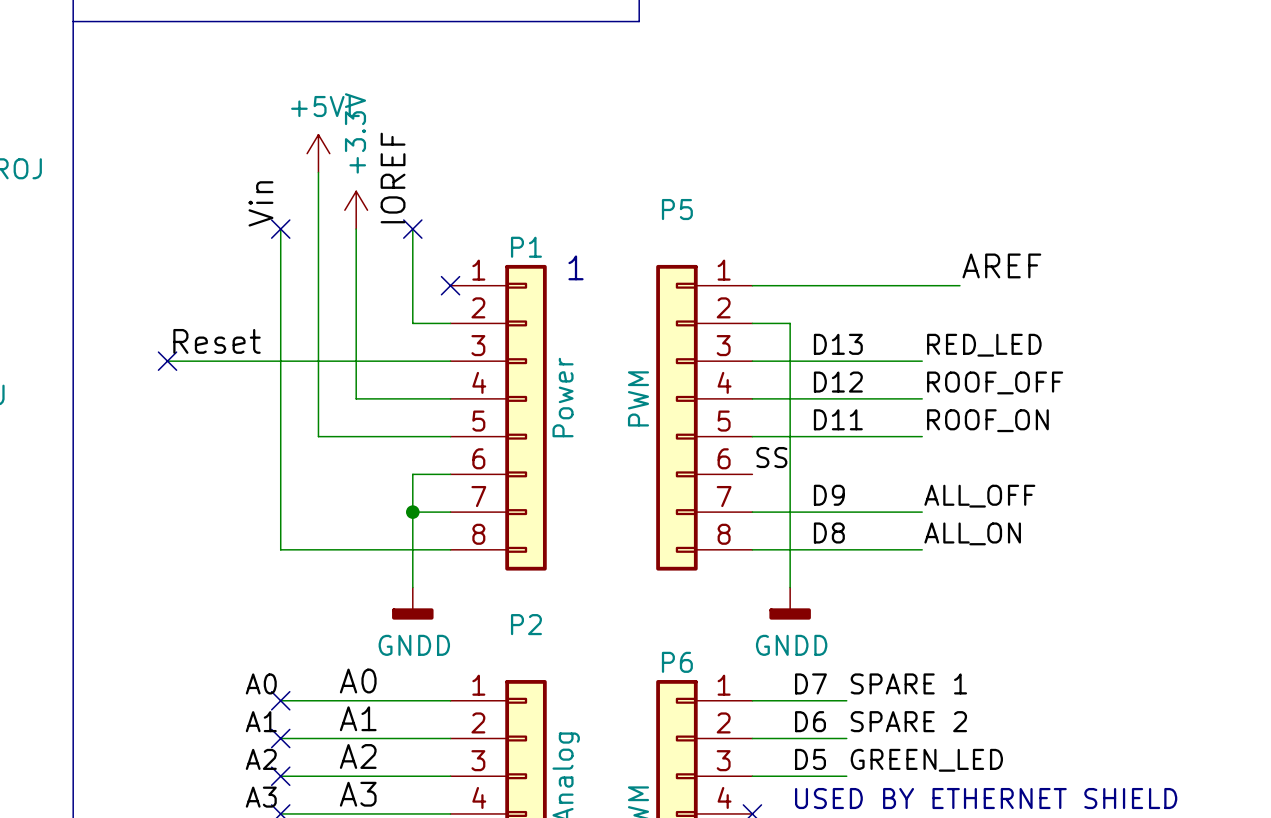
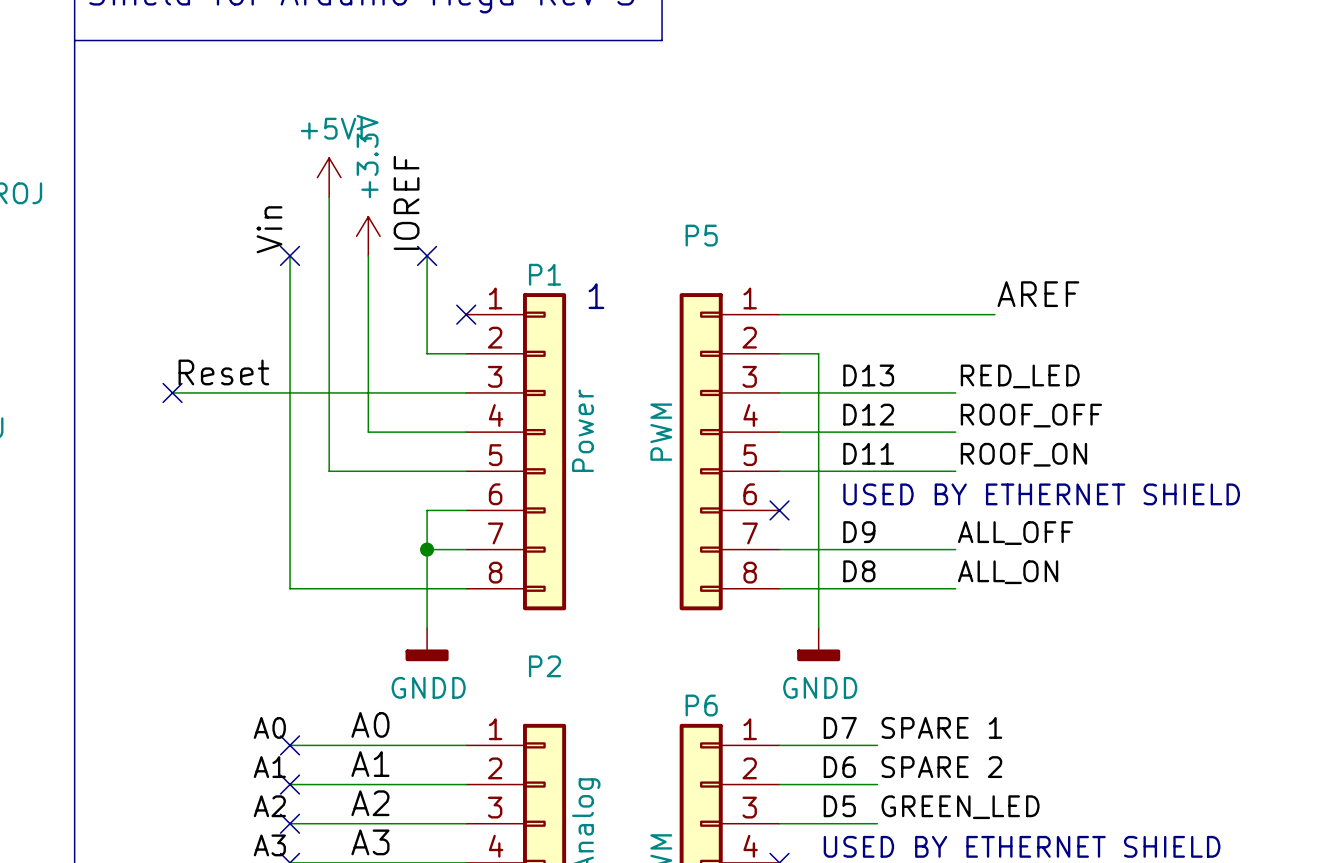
label: SS (771, 457) -> none
text: none -> USED BY ETHERNET SHIELD (1041, 494)
no-connect mark: none -> (779, 510)

